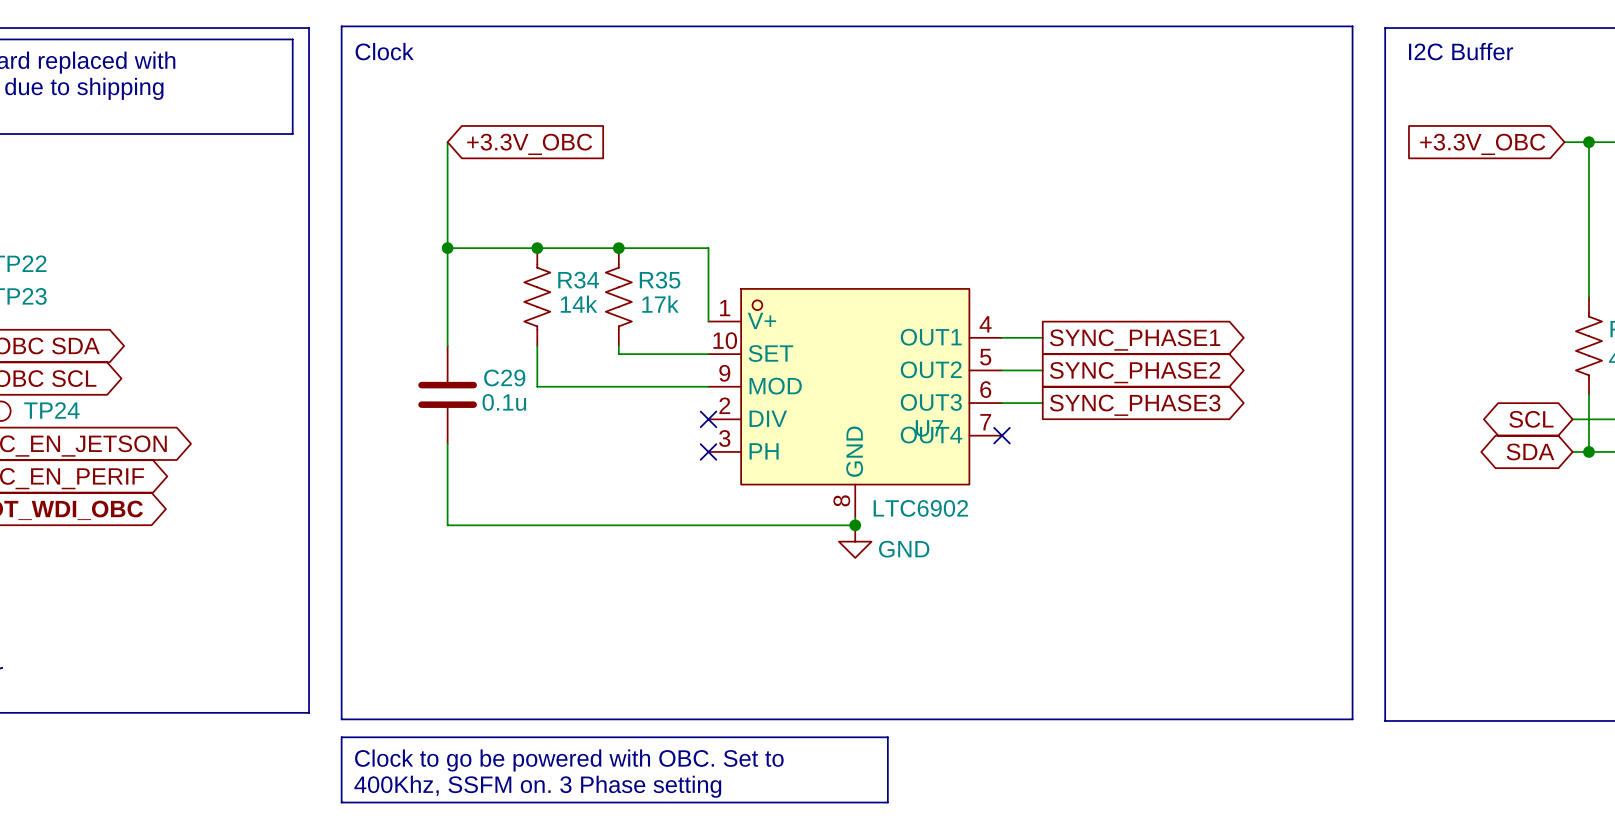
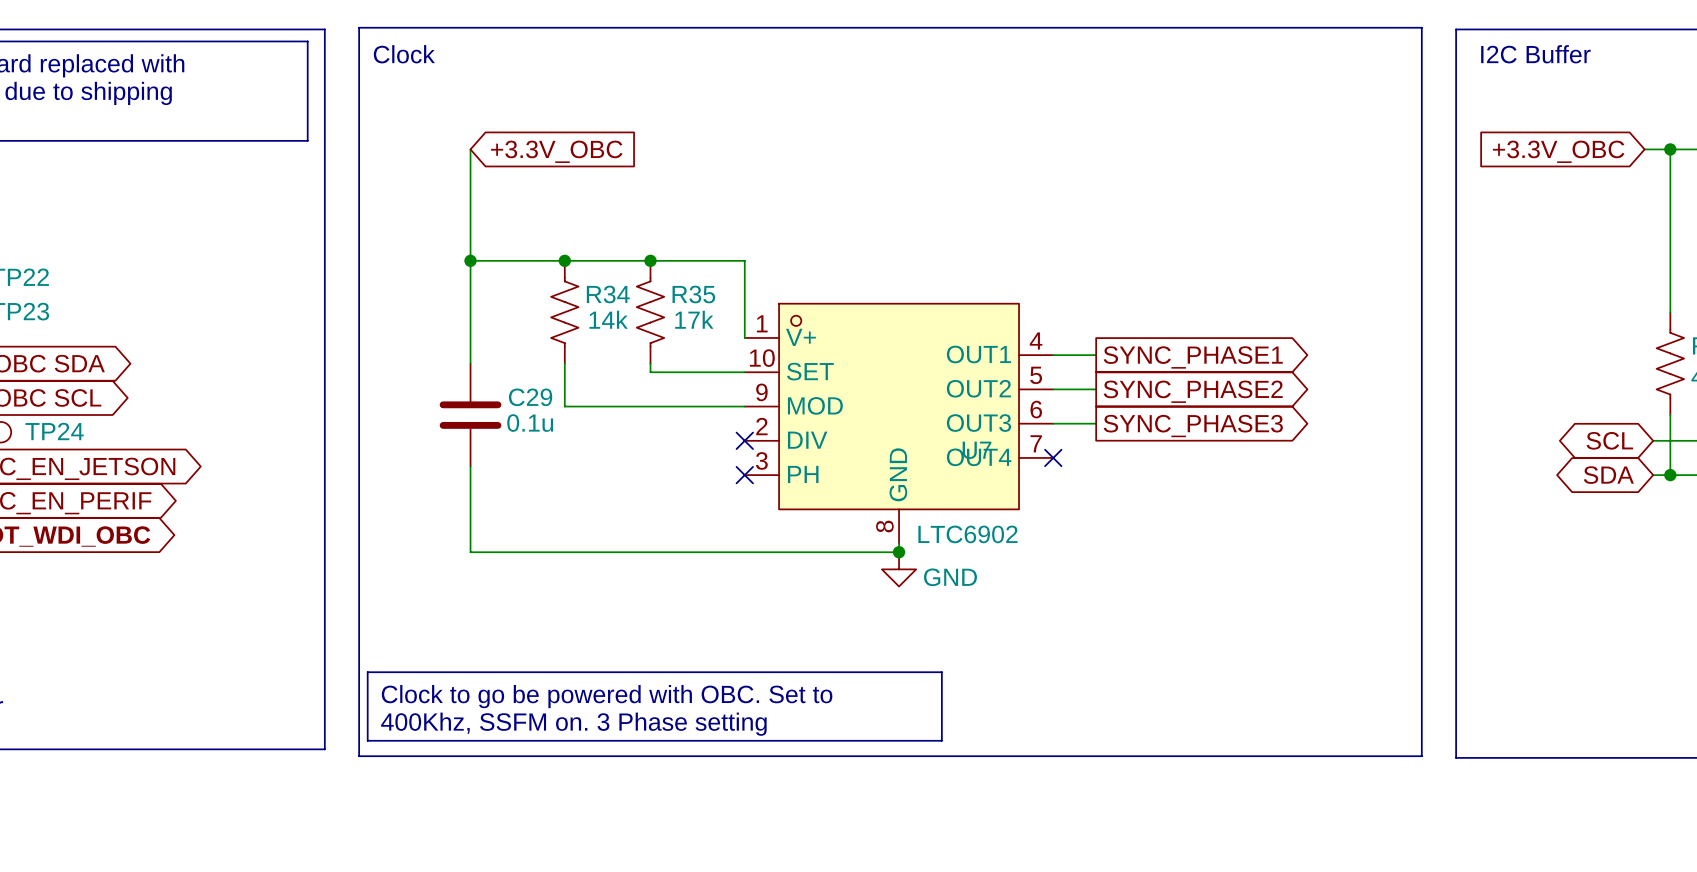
line: (341, 737) (341, 802) (887, 802) (887, 737) (341, 737) -> (367, 672) (367, 740) (941, 740) (941, 672) (367, 672)
text position: Clock to go be powered with OBC. Set to (569, 760) -> Clock to go be powered with OBC. Set to (607, 696)
text position: 400Khz, SSFM on. 3 Phase setting (537, 786) -> 400Khz, SSFM on. 3 Phase setting (573, 724)

